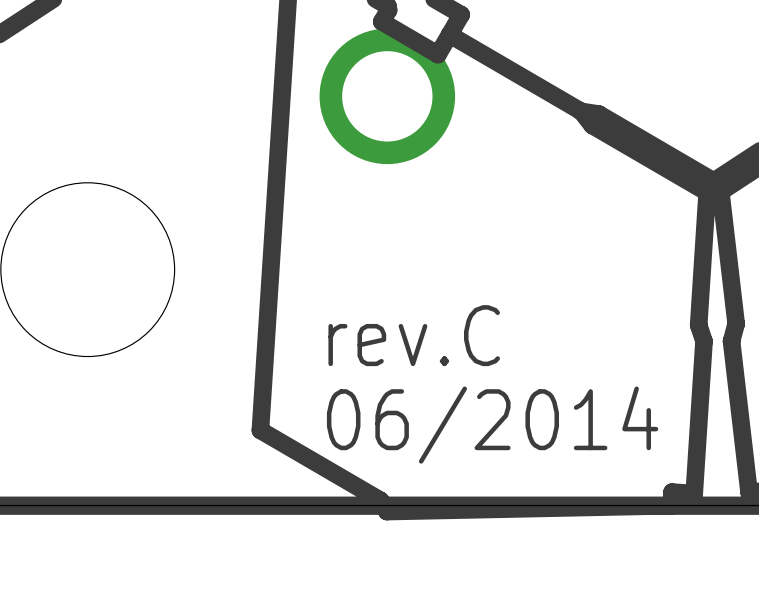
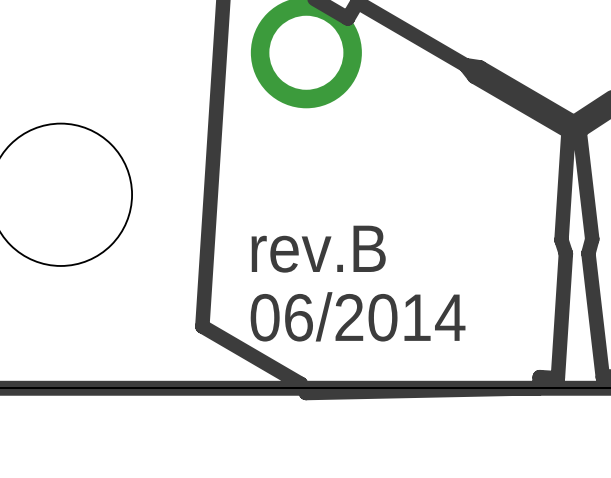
text: rev.C (414, 335) -> rev.B (318, 249)

